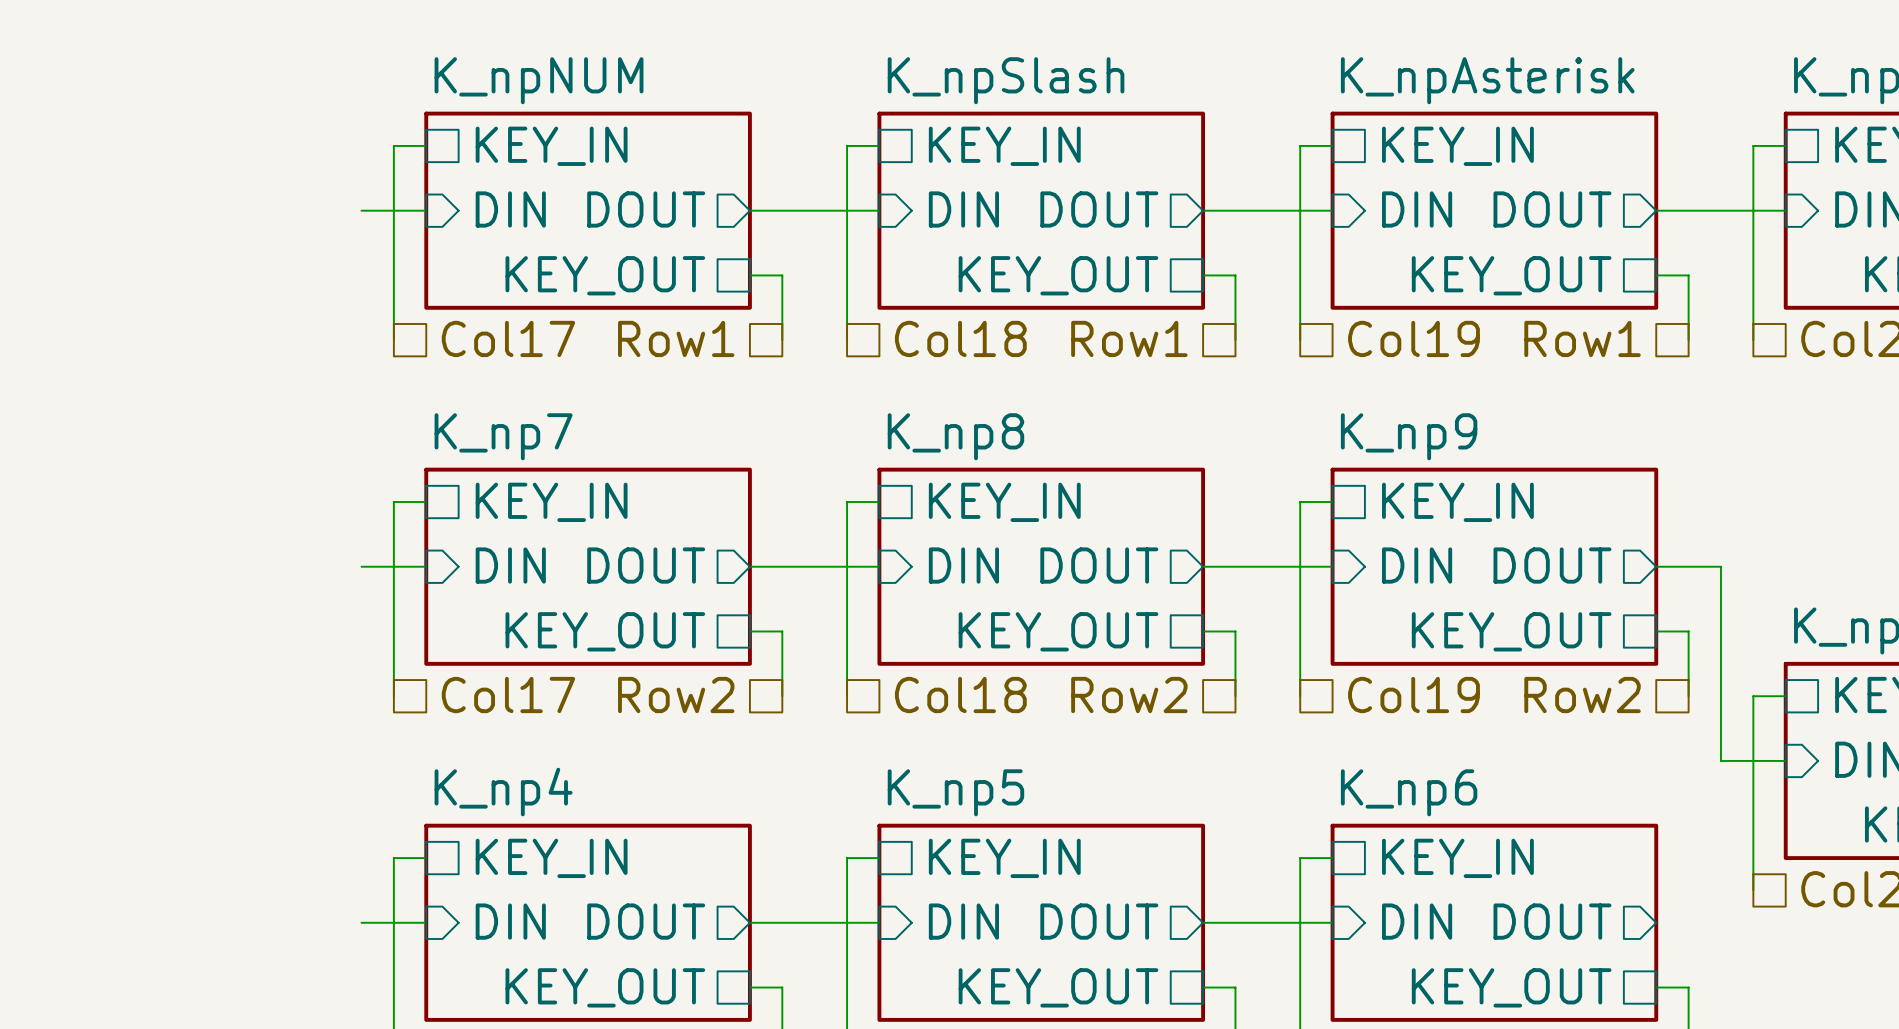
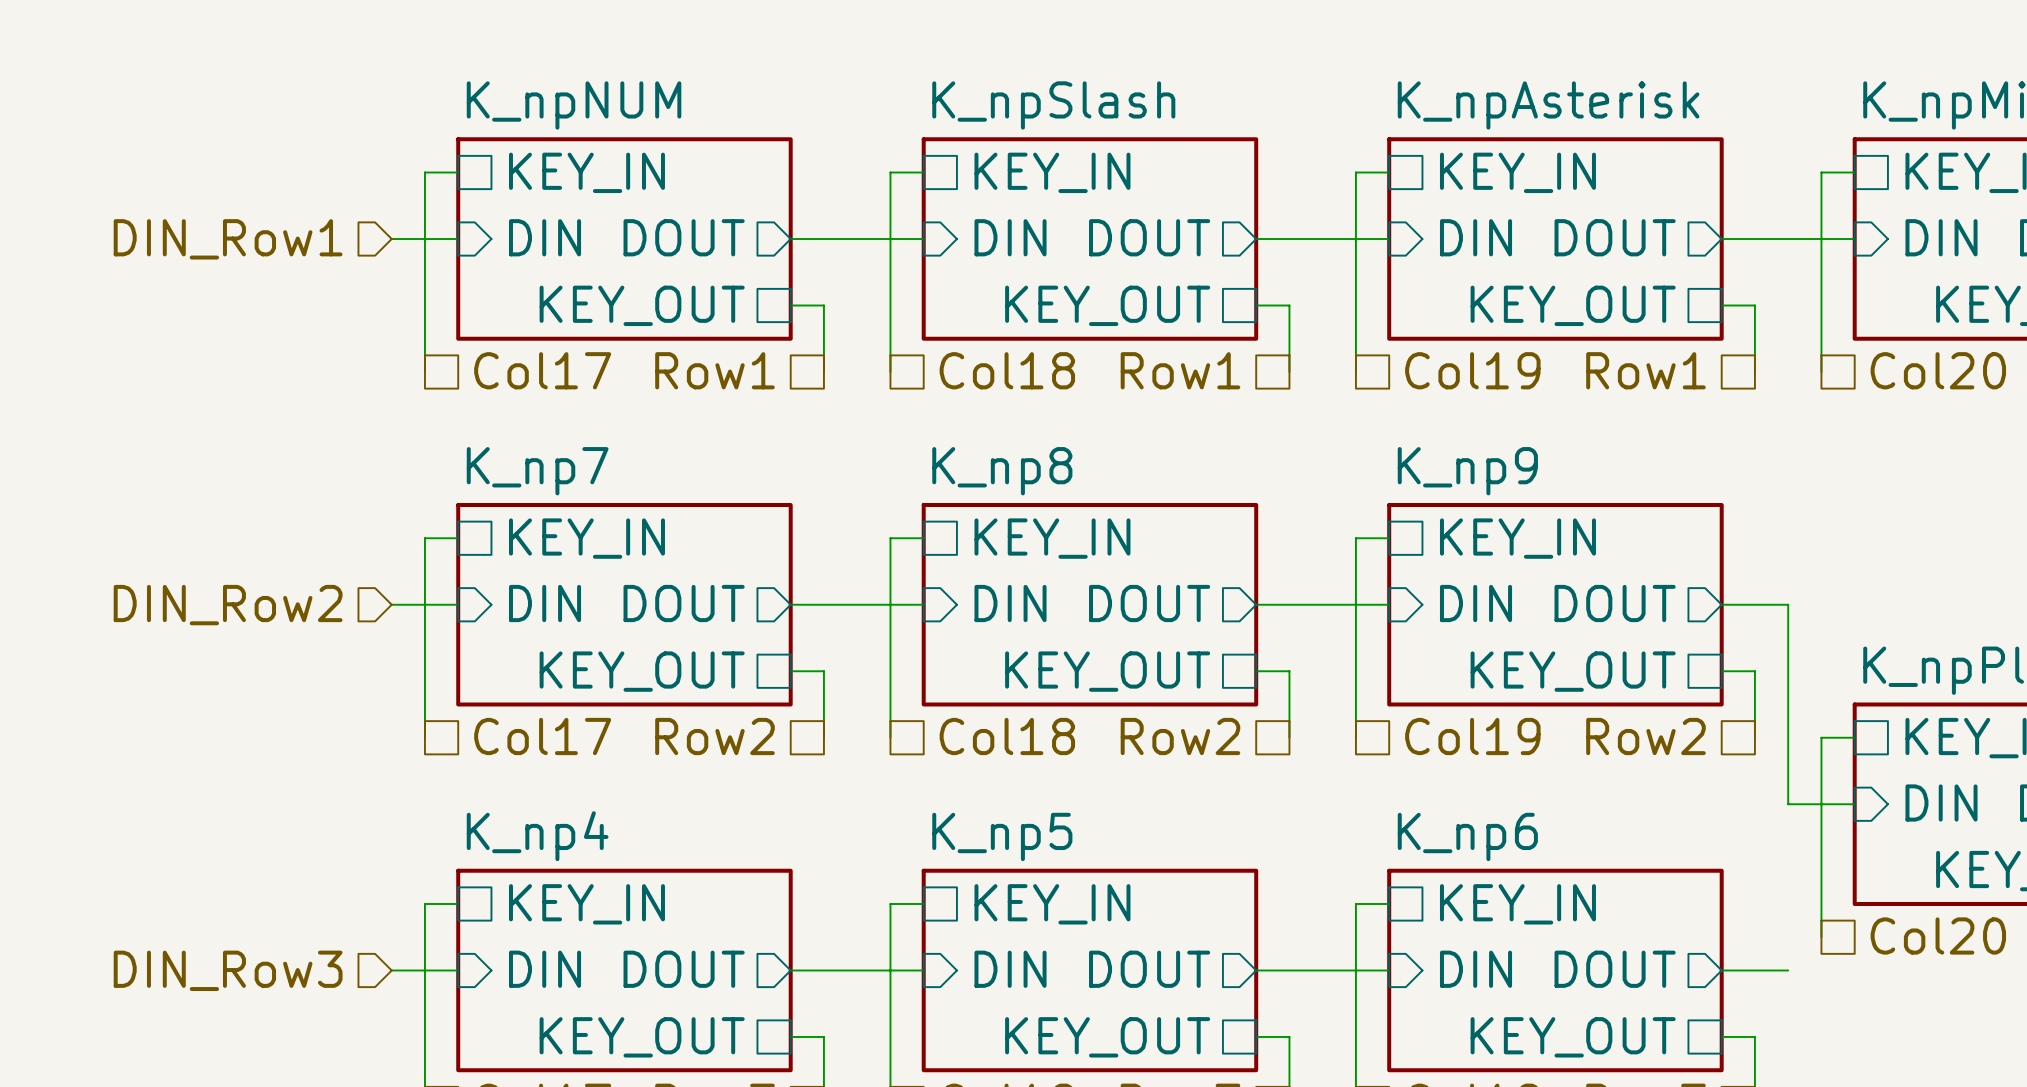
hierarchical label: none -> DIN_Row1 (228, 239)
hierarchical label: none -> DIN_Row2 (228, 605)
wire: none -> (1721, 970) (1788, 970)
hierarchical label: none -> DIN_Row3 (228, 970)

